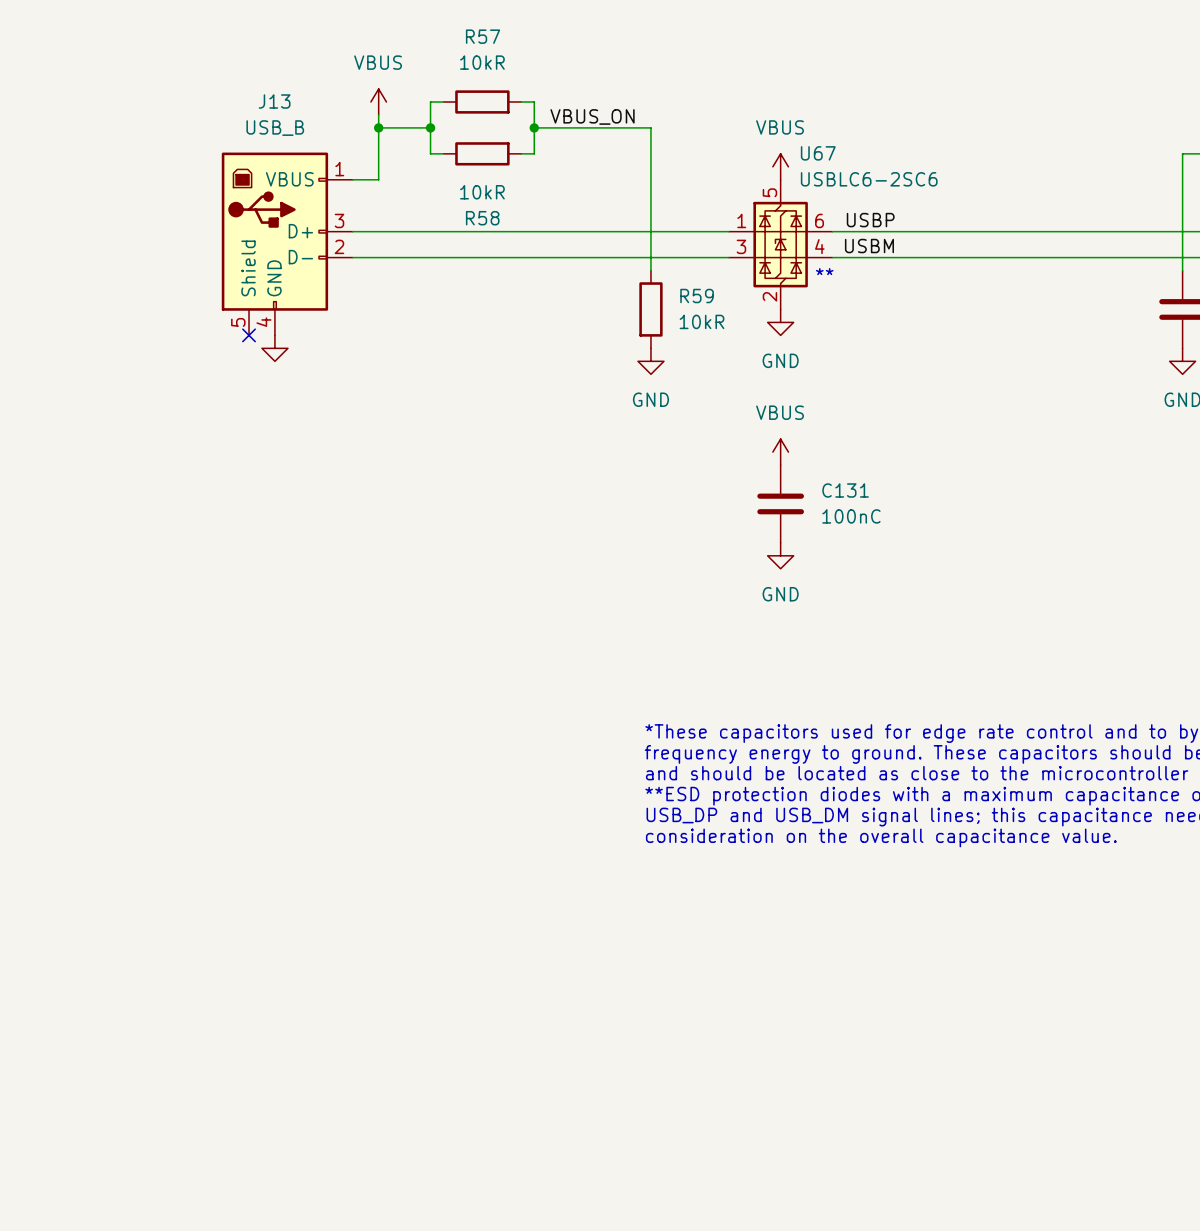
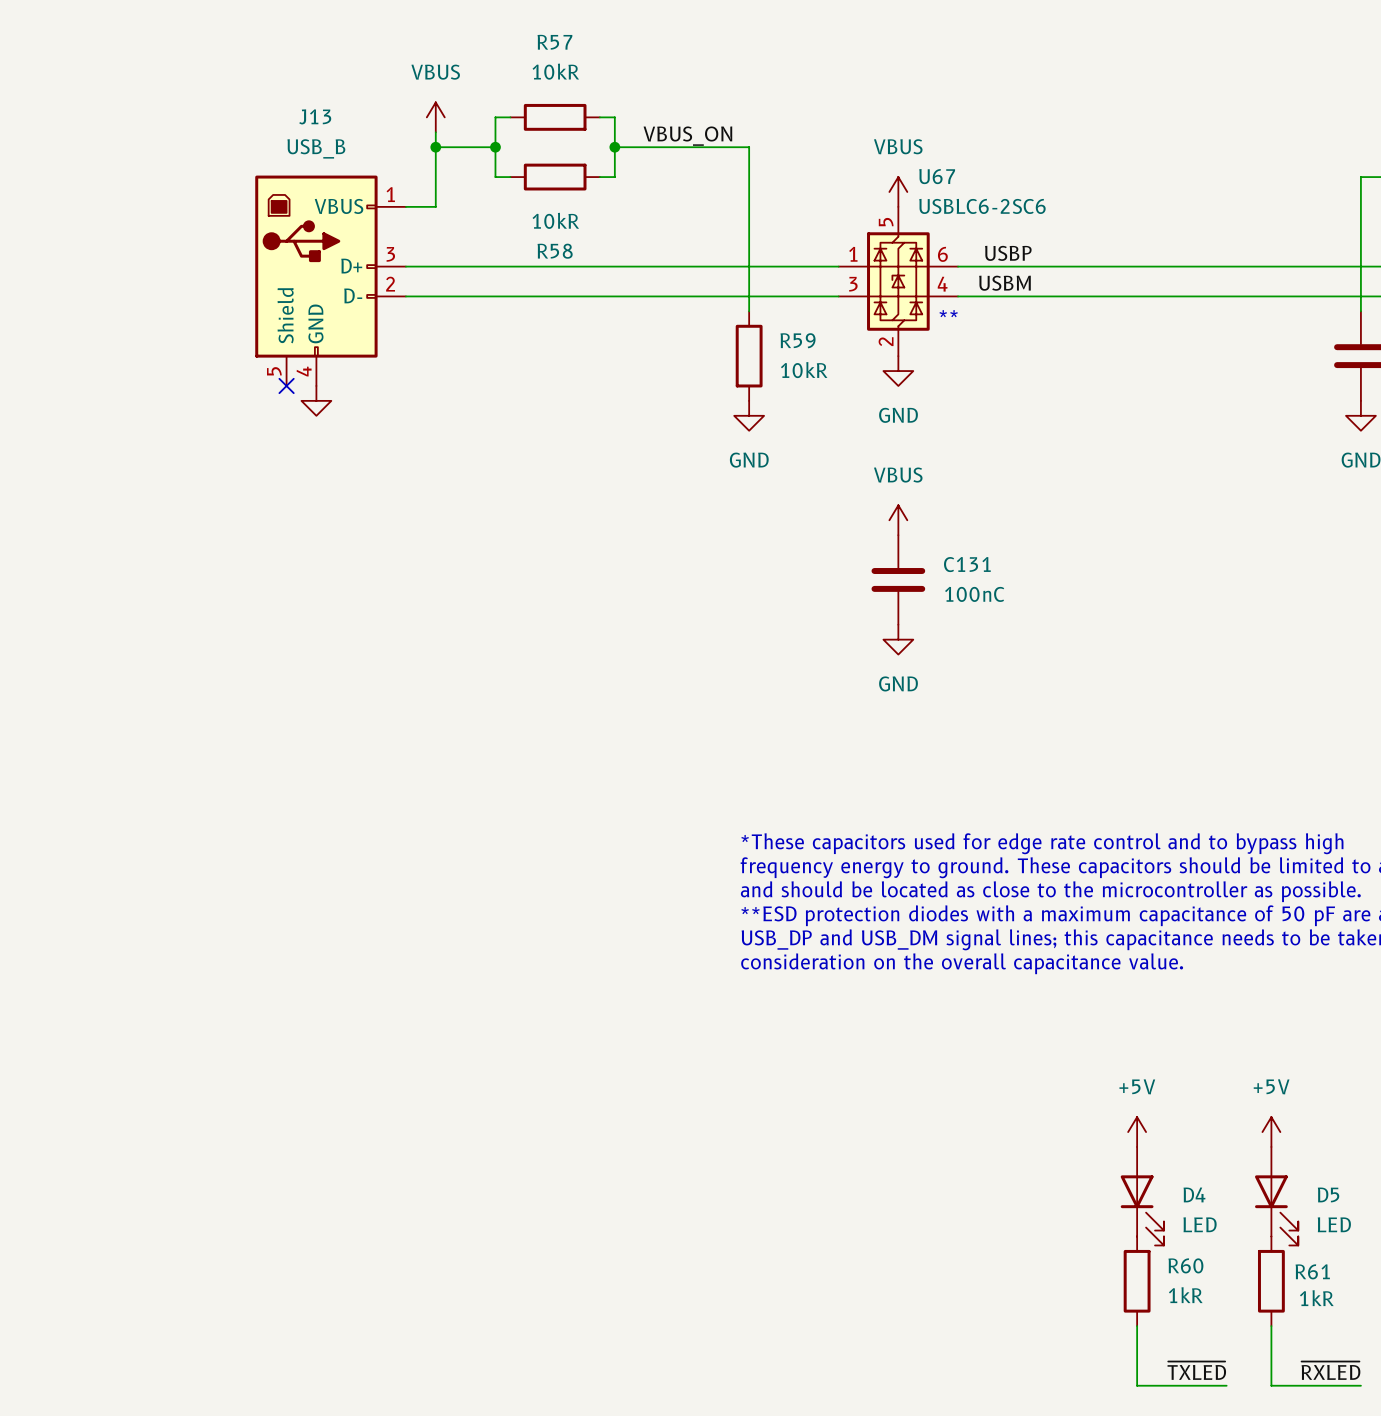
power symbol: none -> +5V (1137, 1132)
power symbol: none -> +5V (1271, 1132)
D4: none -> LED (1142, 1196)
D5: none -> LED (1276, 1196)
R60: none -> 1kR (1137, 1281)
R61: none -> 1kR (1271, 1281)
wire: none -> (1137, 1326) (1137, 1385) (1226, 1385)
wire: none -> (1271, 1326) (1271, 1385) (1360, 1385)
label: none -> ~{TXLED} (1196, 1370)
label: none -> ~{RXLED} (1330, 1370)

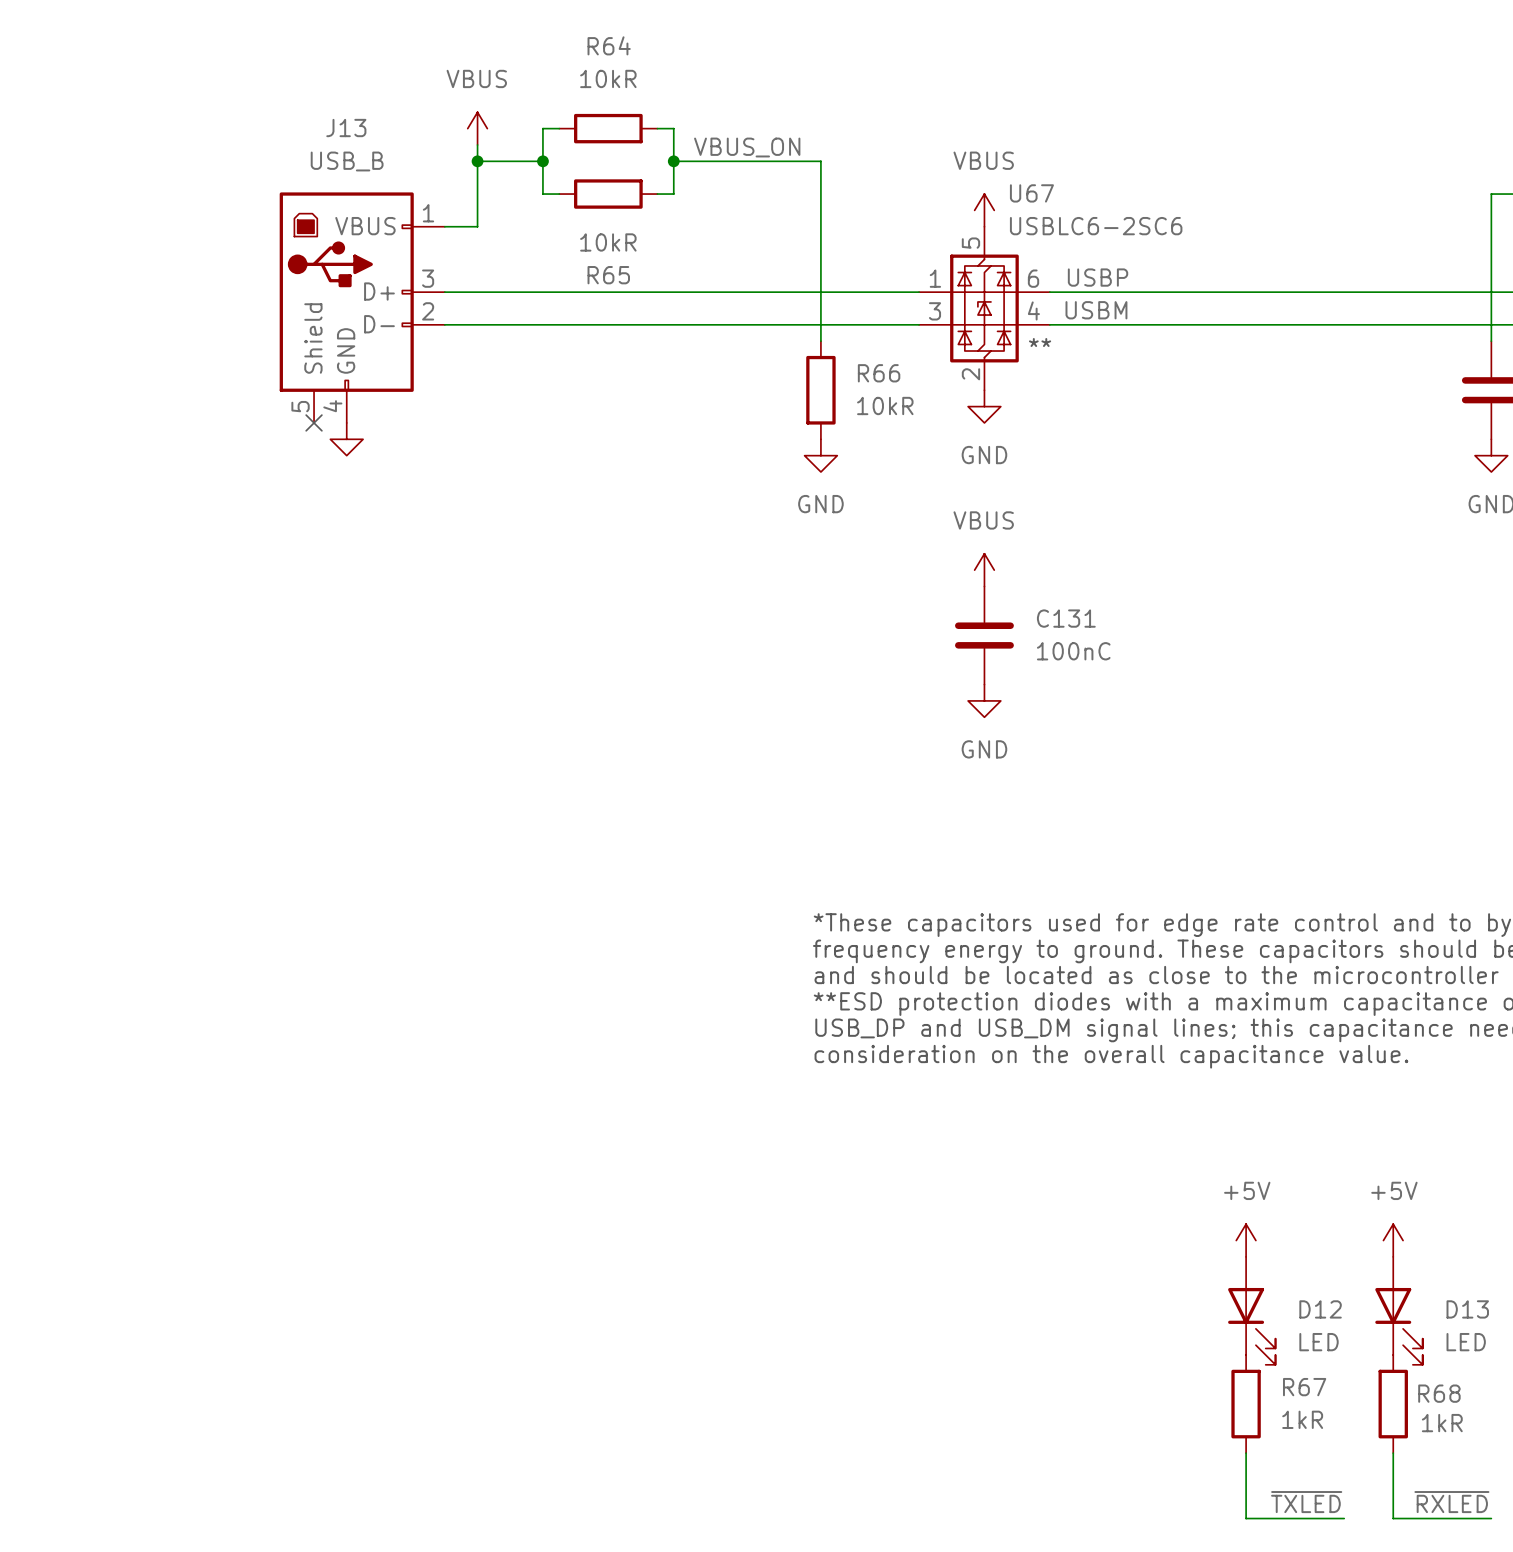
R57 name: R57 (554, 42) -> R64 (609, 45)
R58 name: R58 (555, 251) -> R65 (608, 275)
R59 name: R59 (798, 340) -> R66 (879, 373)
D4 name: D4 (1194, 1194) -> D12 (1320, 1309)
D5 name: D5 (1328, 1194) -> D13 (1467, 1309)
R60 name: R60 (1185, 1265) -> R67 (1304, 1387)
R61 name: R61 (1312, 1271) -> R68 (1439, 1393)

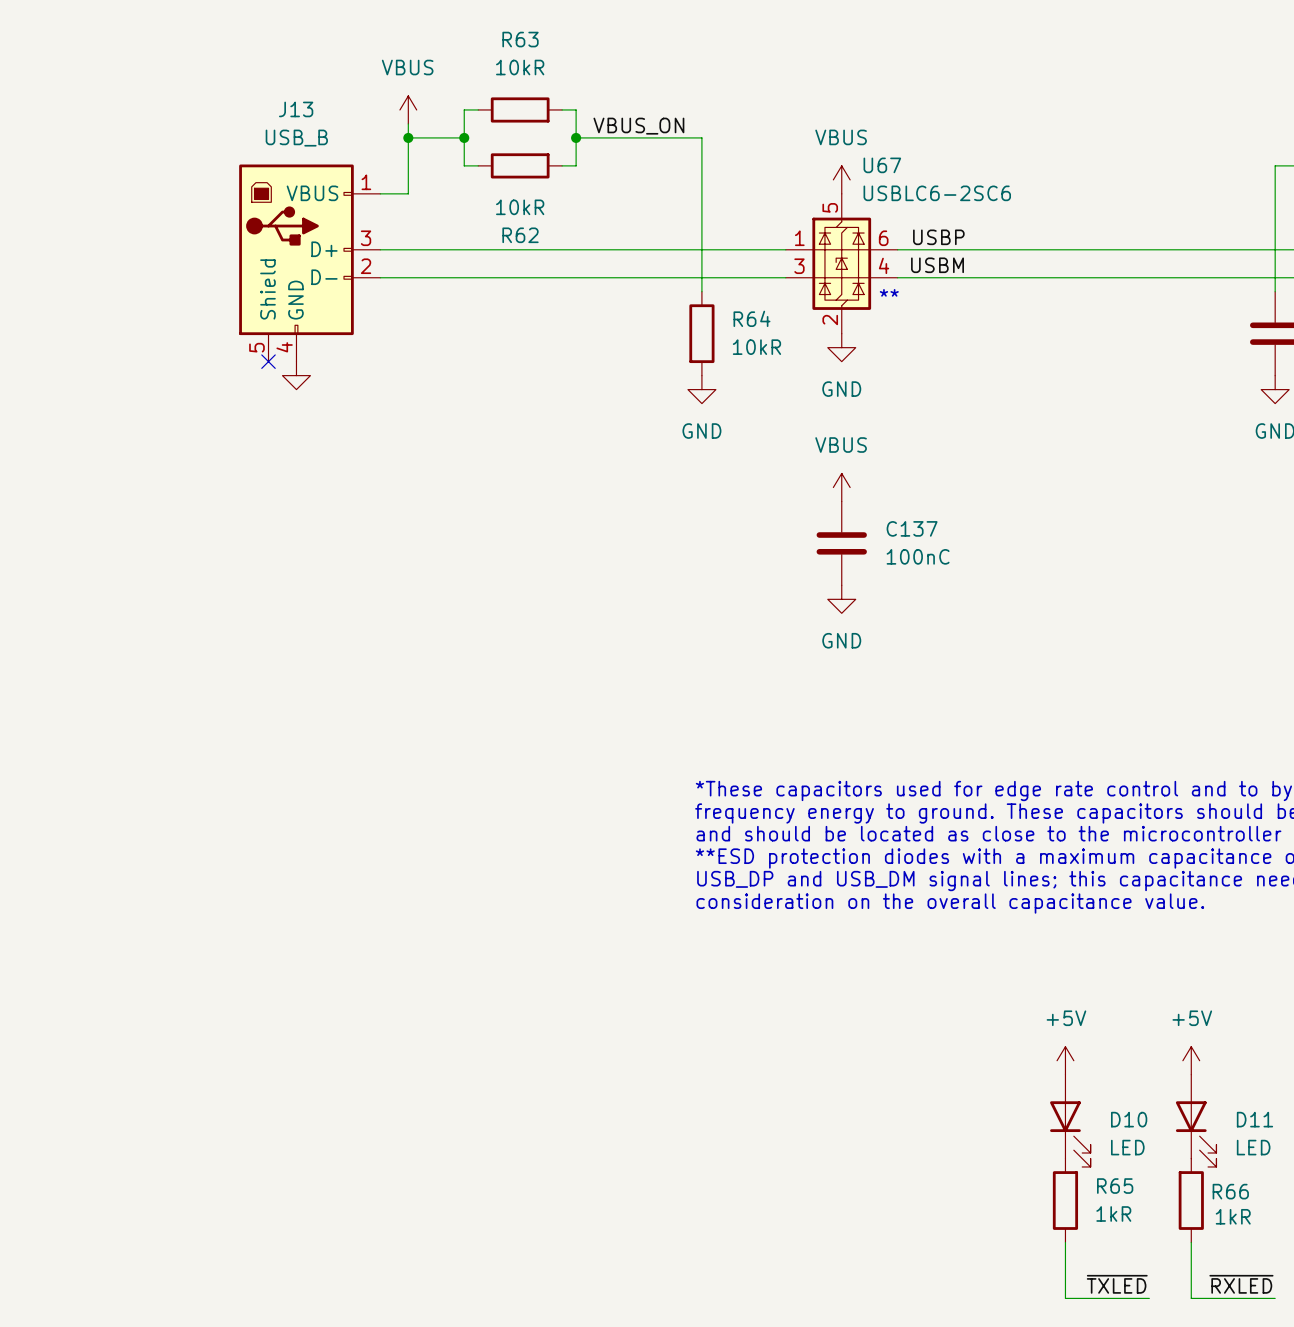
R64 name: R64 (609, 45) -> R63 (520, 39)
R65 name: R65 (608, 275) -> R62 (520, 235)
R66 name: R66 (879, 373) -> R64 (751, 318)
C131 name: C131 (1066, 618) -> C137 (912, 528)
D12 name: D12 (1320, 1309) -> D10 (1129, 1119)
D13 name: D13 (1467, 1309) -> D11 (1254, 1119)
R67 name: R67 (1304, 1387) -> R65 (1115, 1186)
R68 name: R68 (1439, 1393) -> R66 (1230, 1191)

